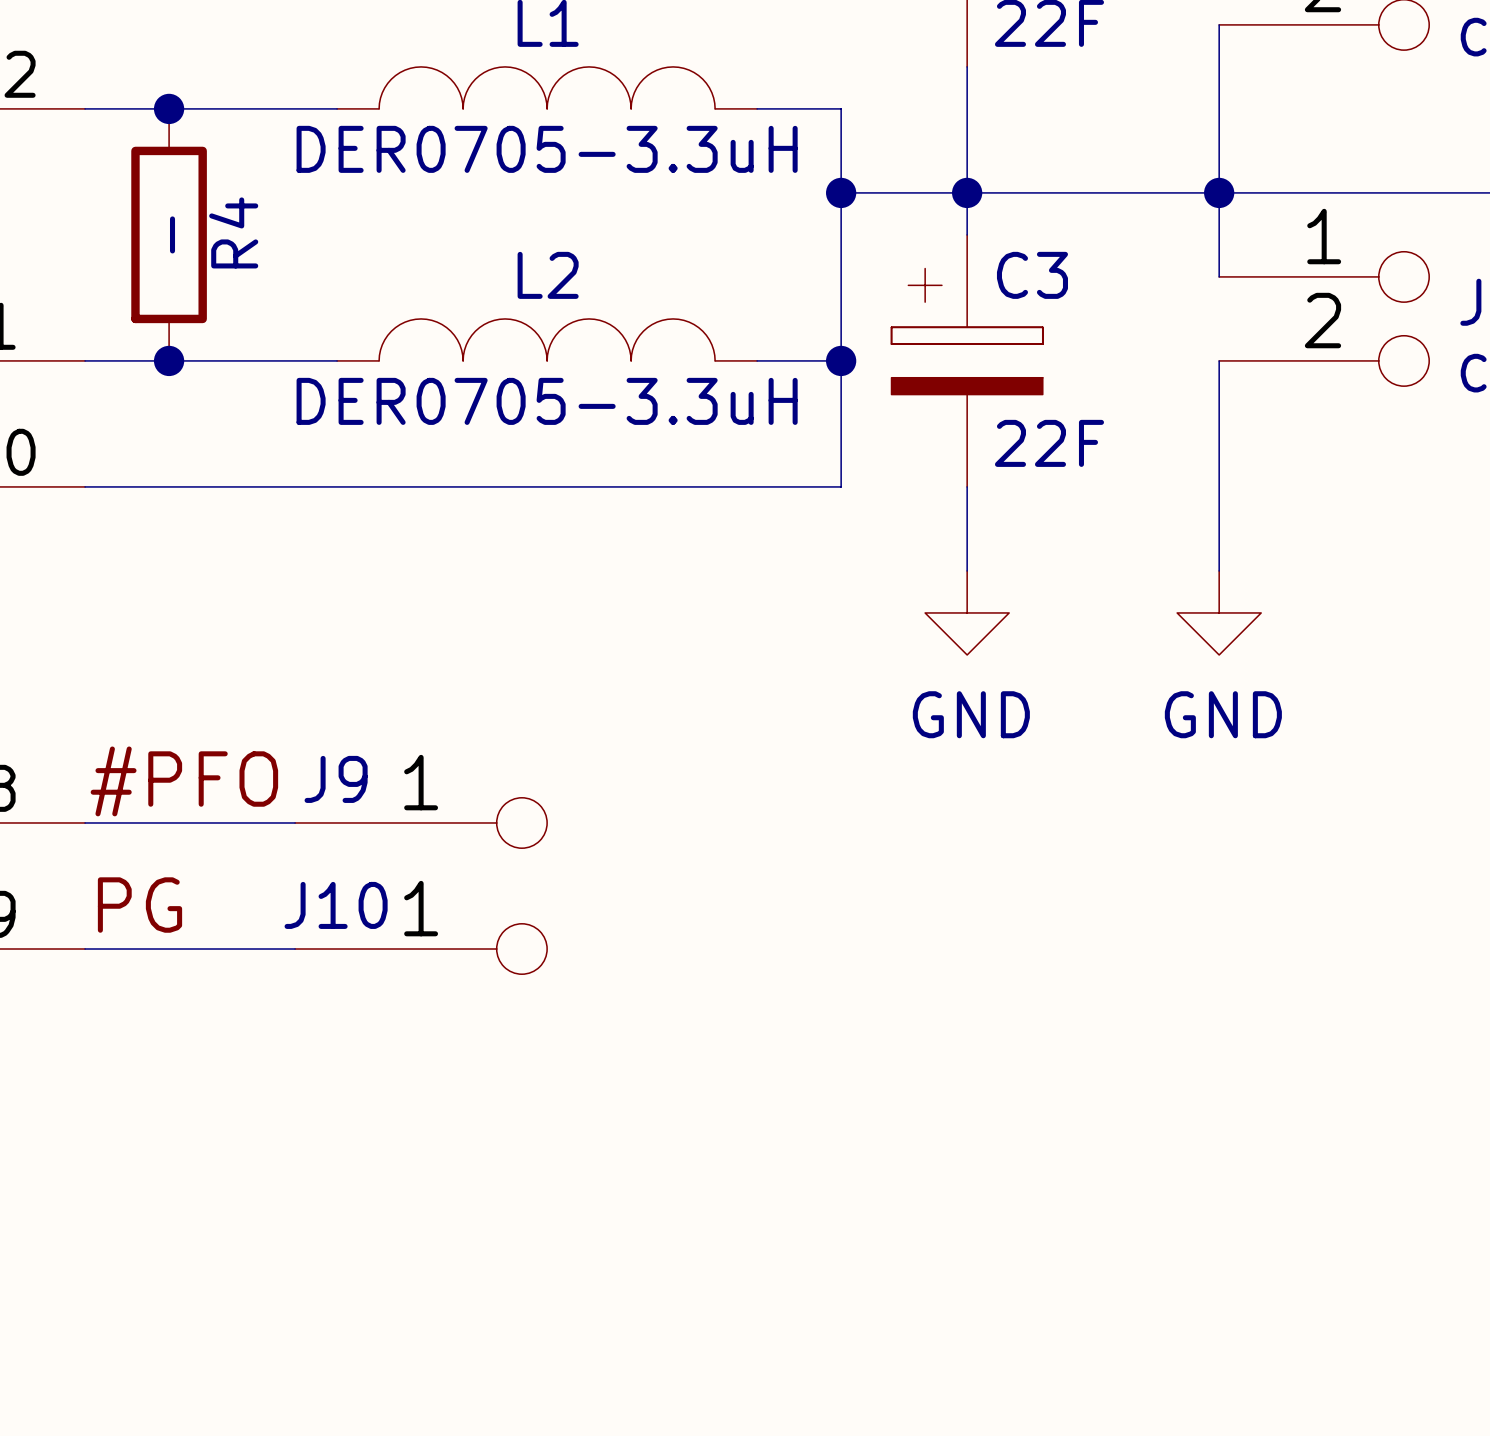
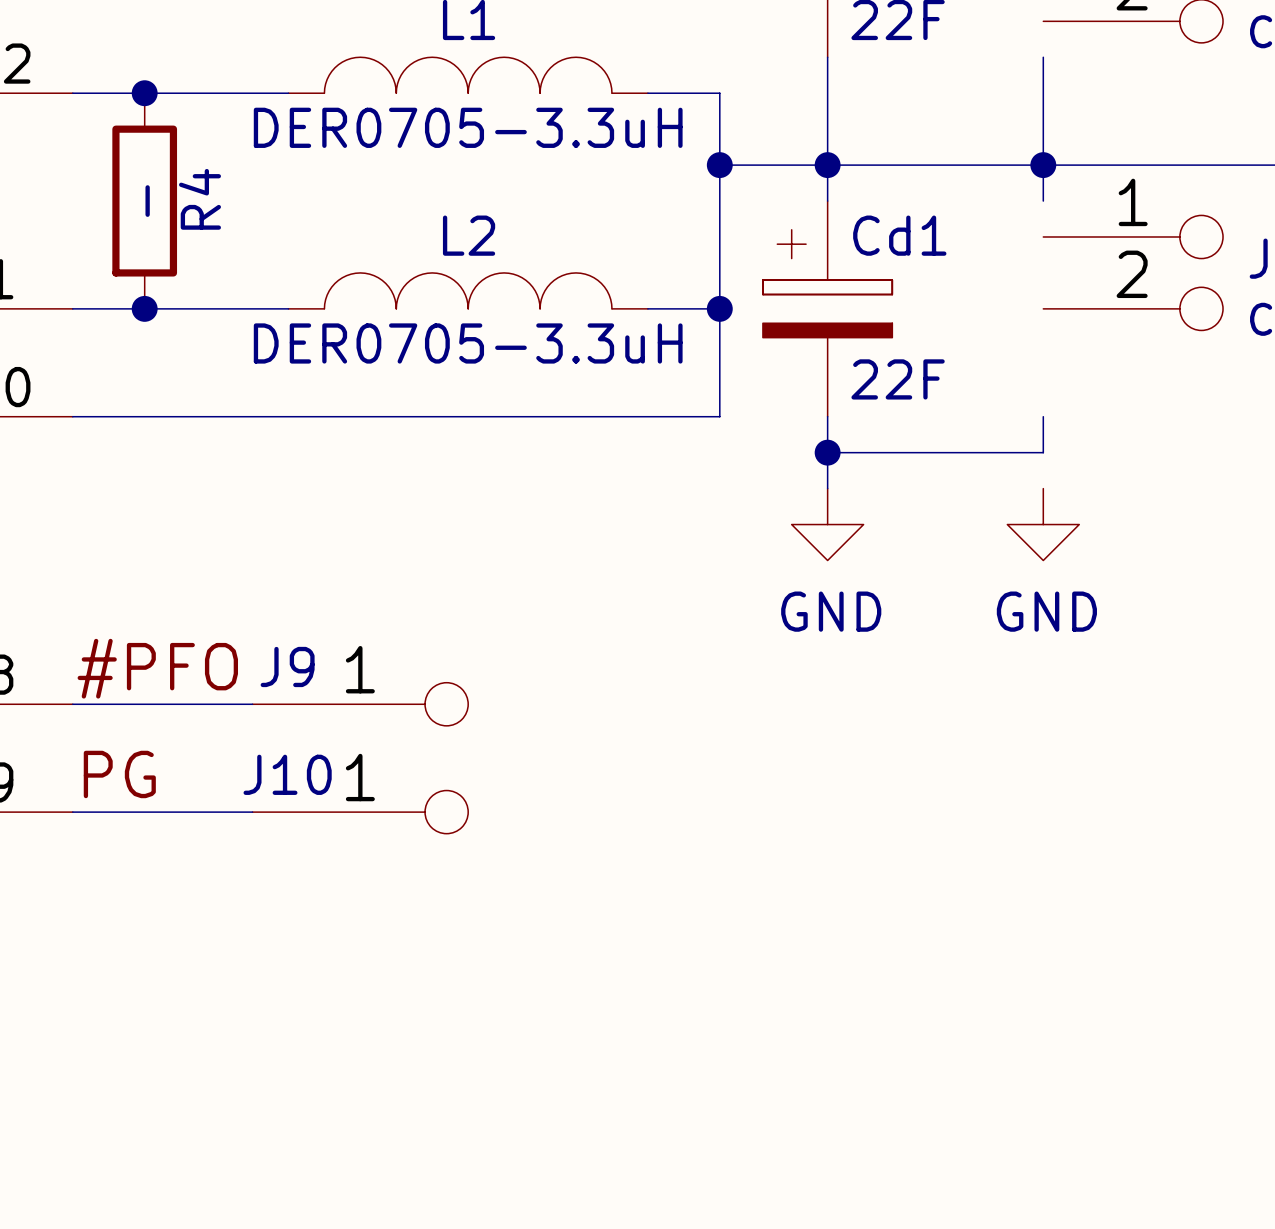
wire: (1219, 24) (1219, 66) -> none
wire: (1219, 234) (1219, 276) -> none
C3 name: C3 (1032, 275) -> Cd1 (899, 235)
wire: (1219, 360) (1219, 486) -> none
junction: none -> (827, 452)
wire: (1219, 528) (1219, 570) -> (1043, 452) (827, 452)

